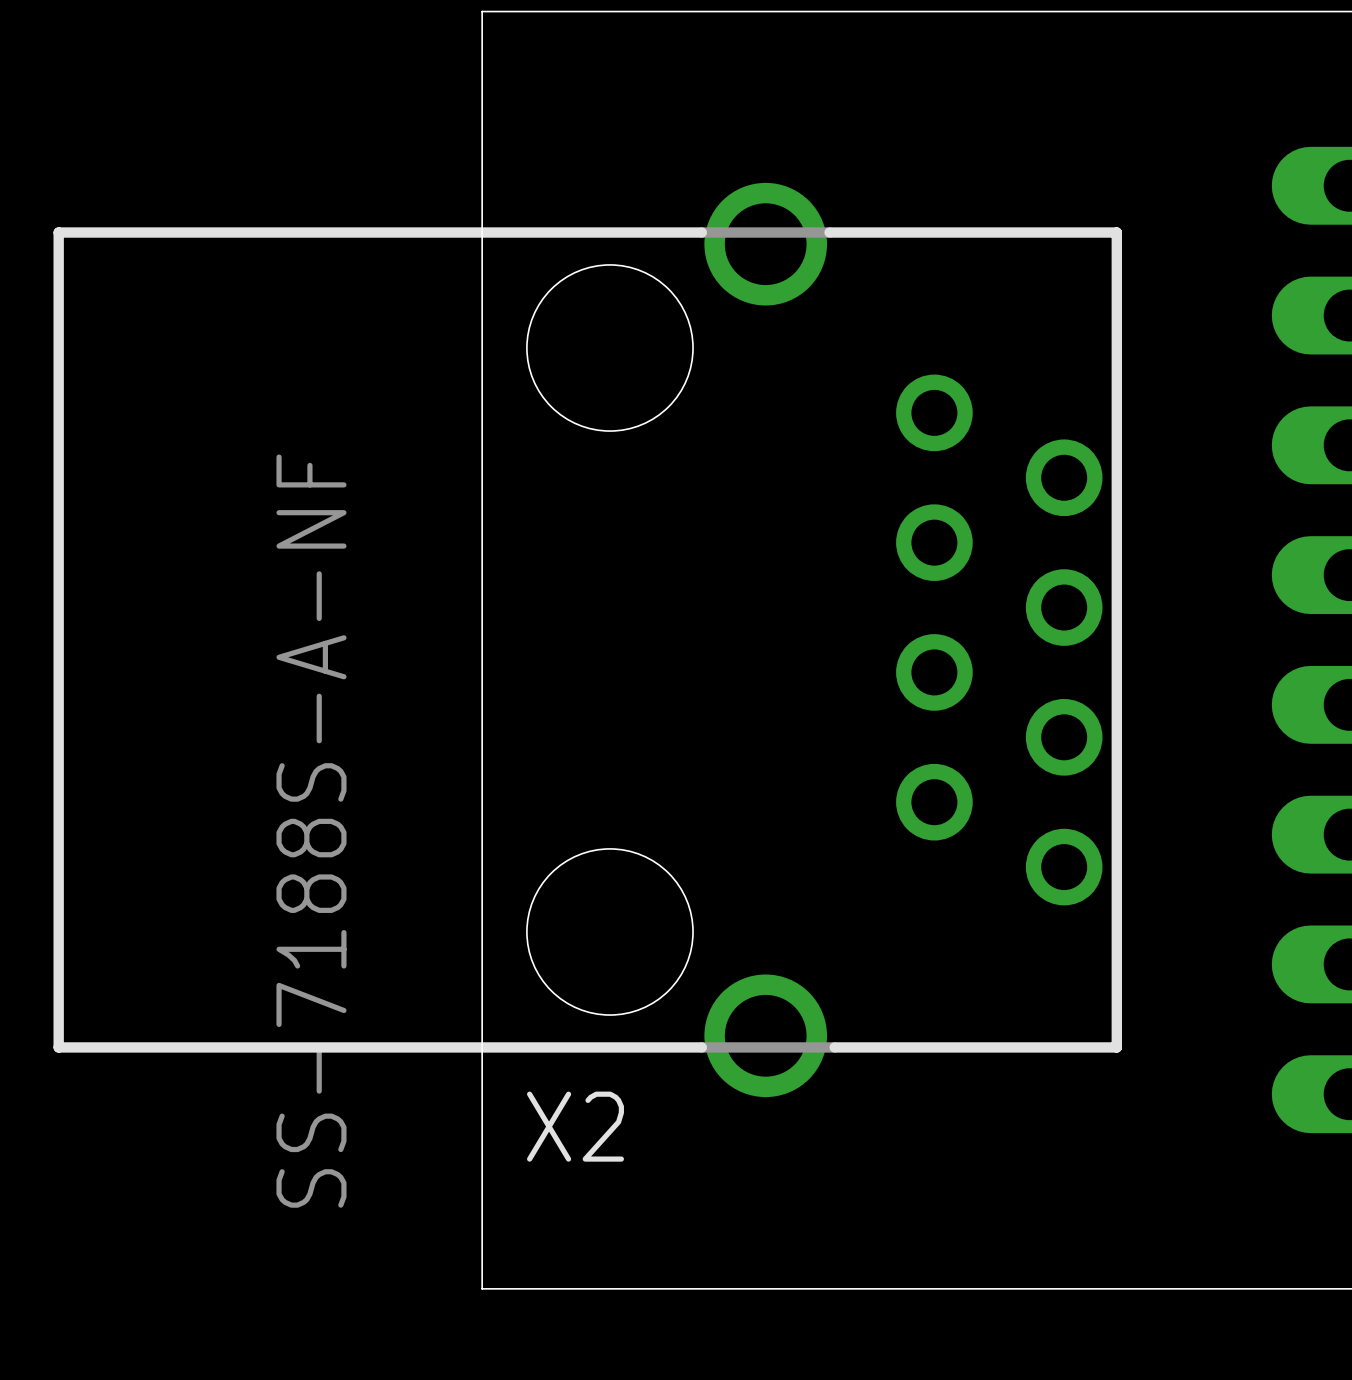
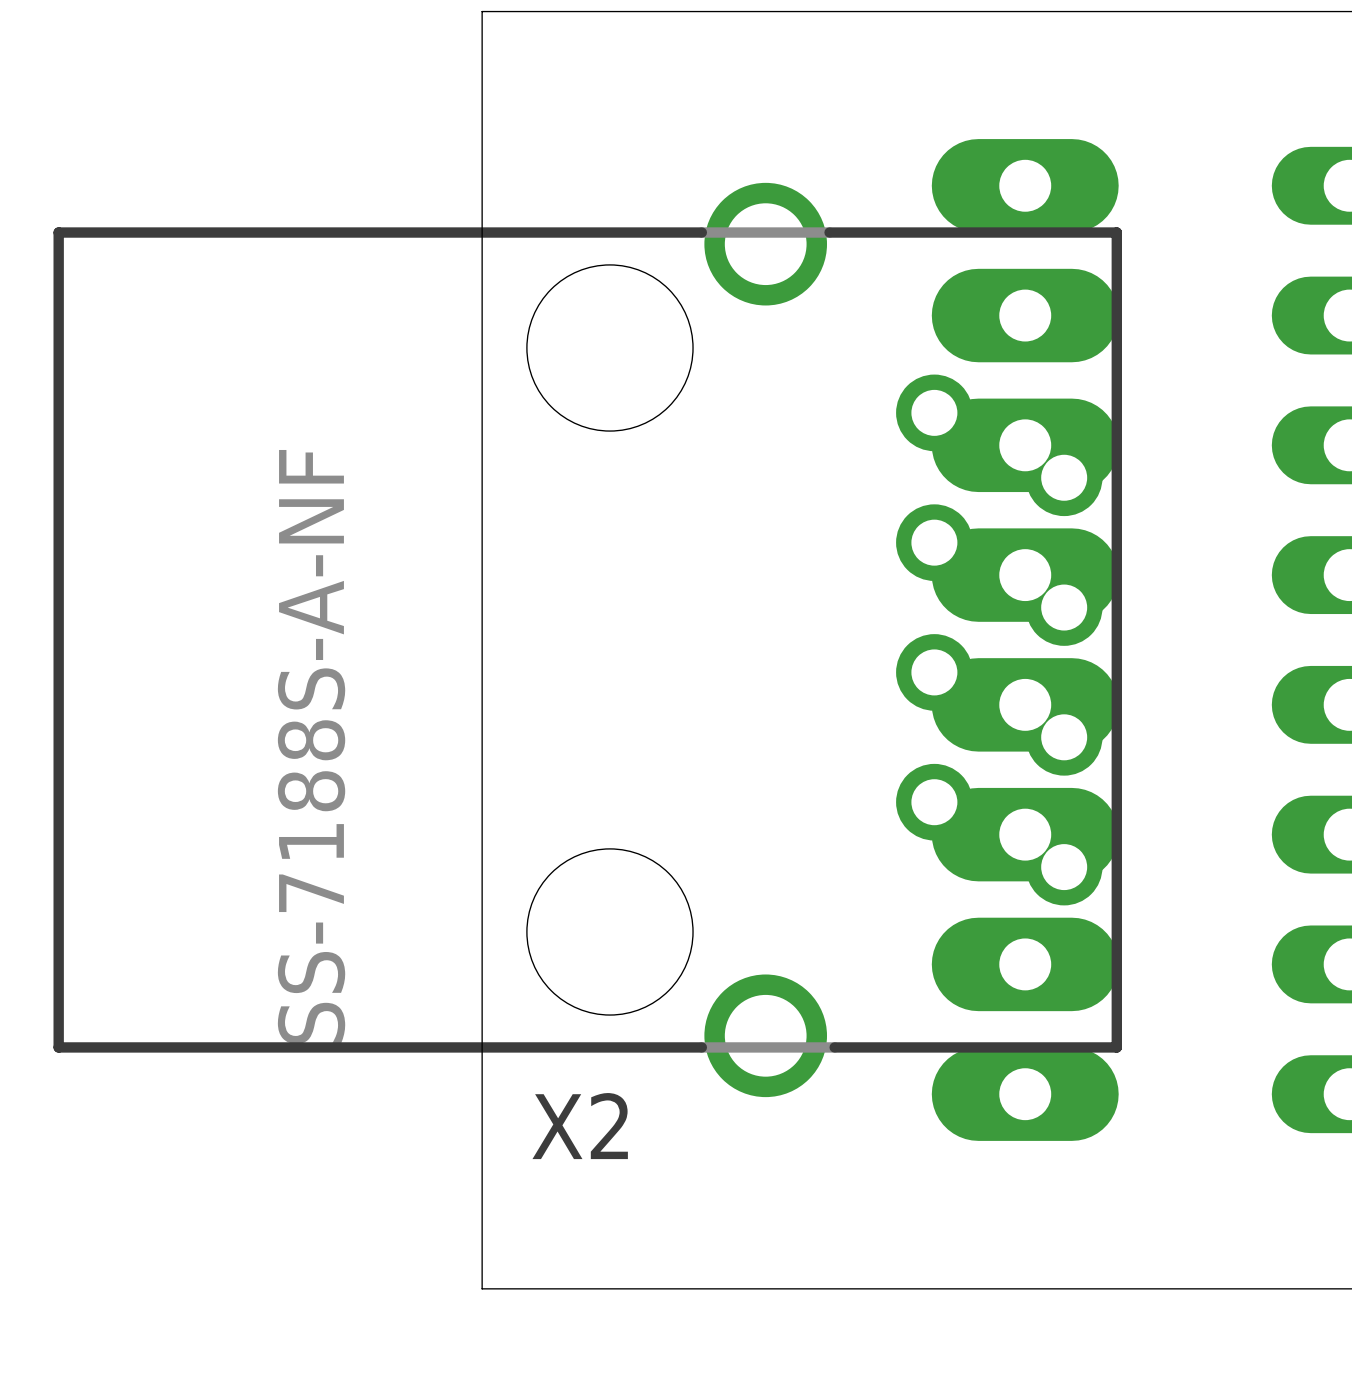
part: none -> (1025, 639)

